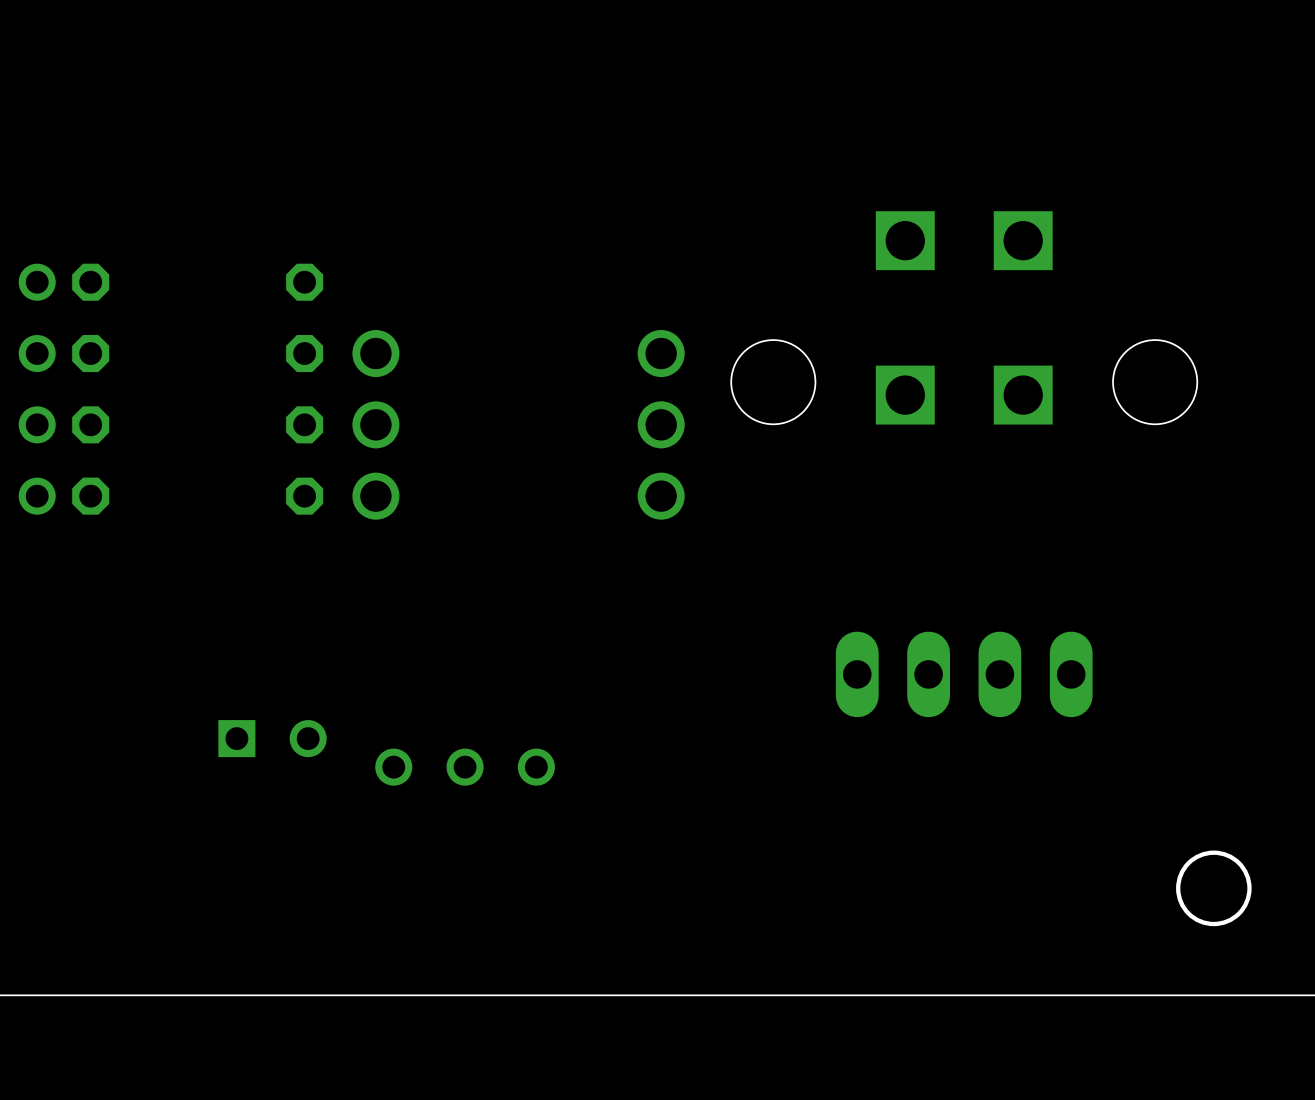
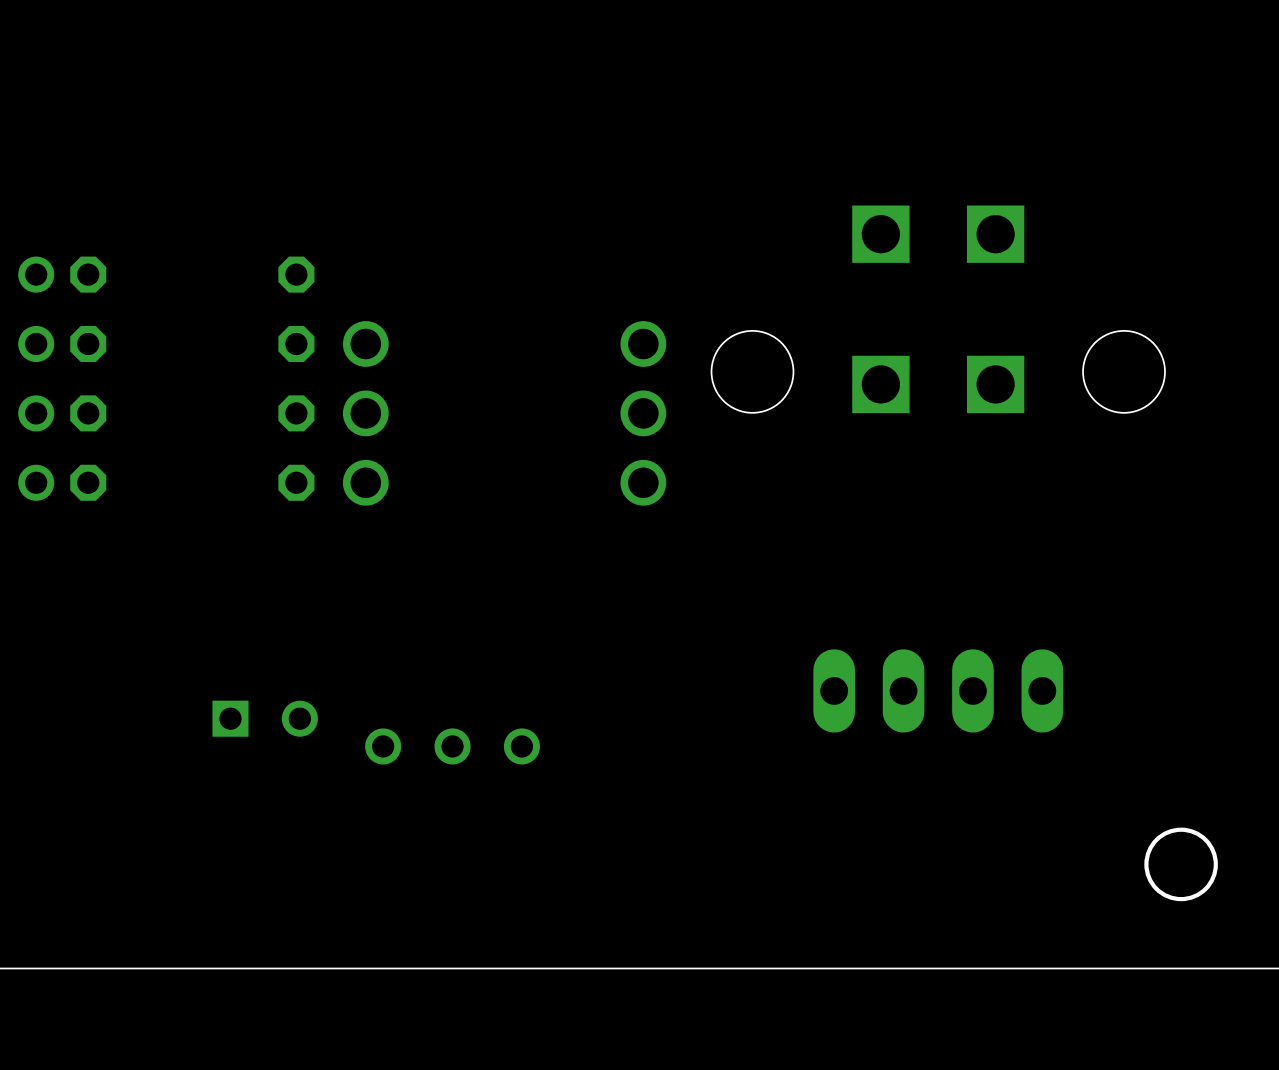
part position: (964, 674) -> (938, 690)

